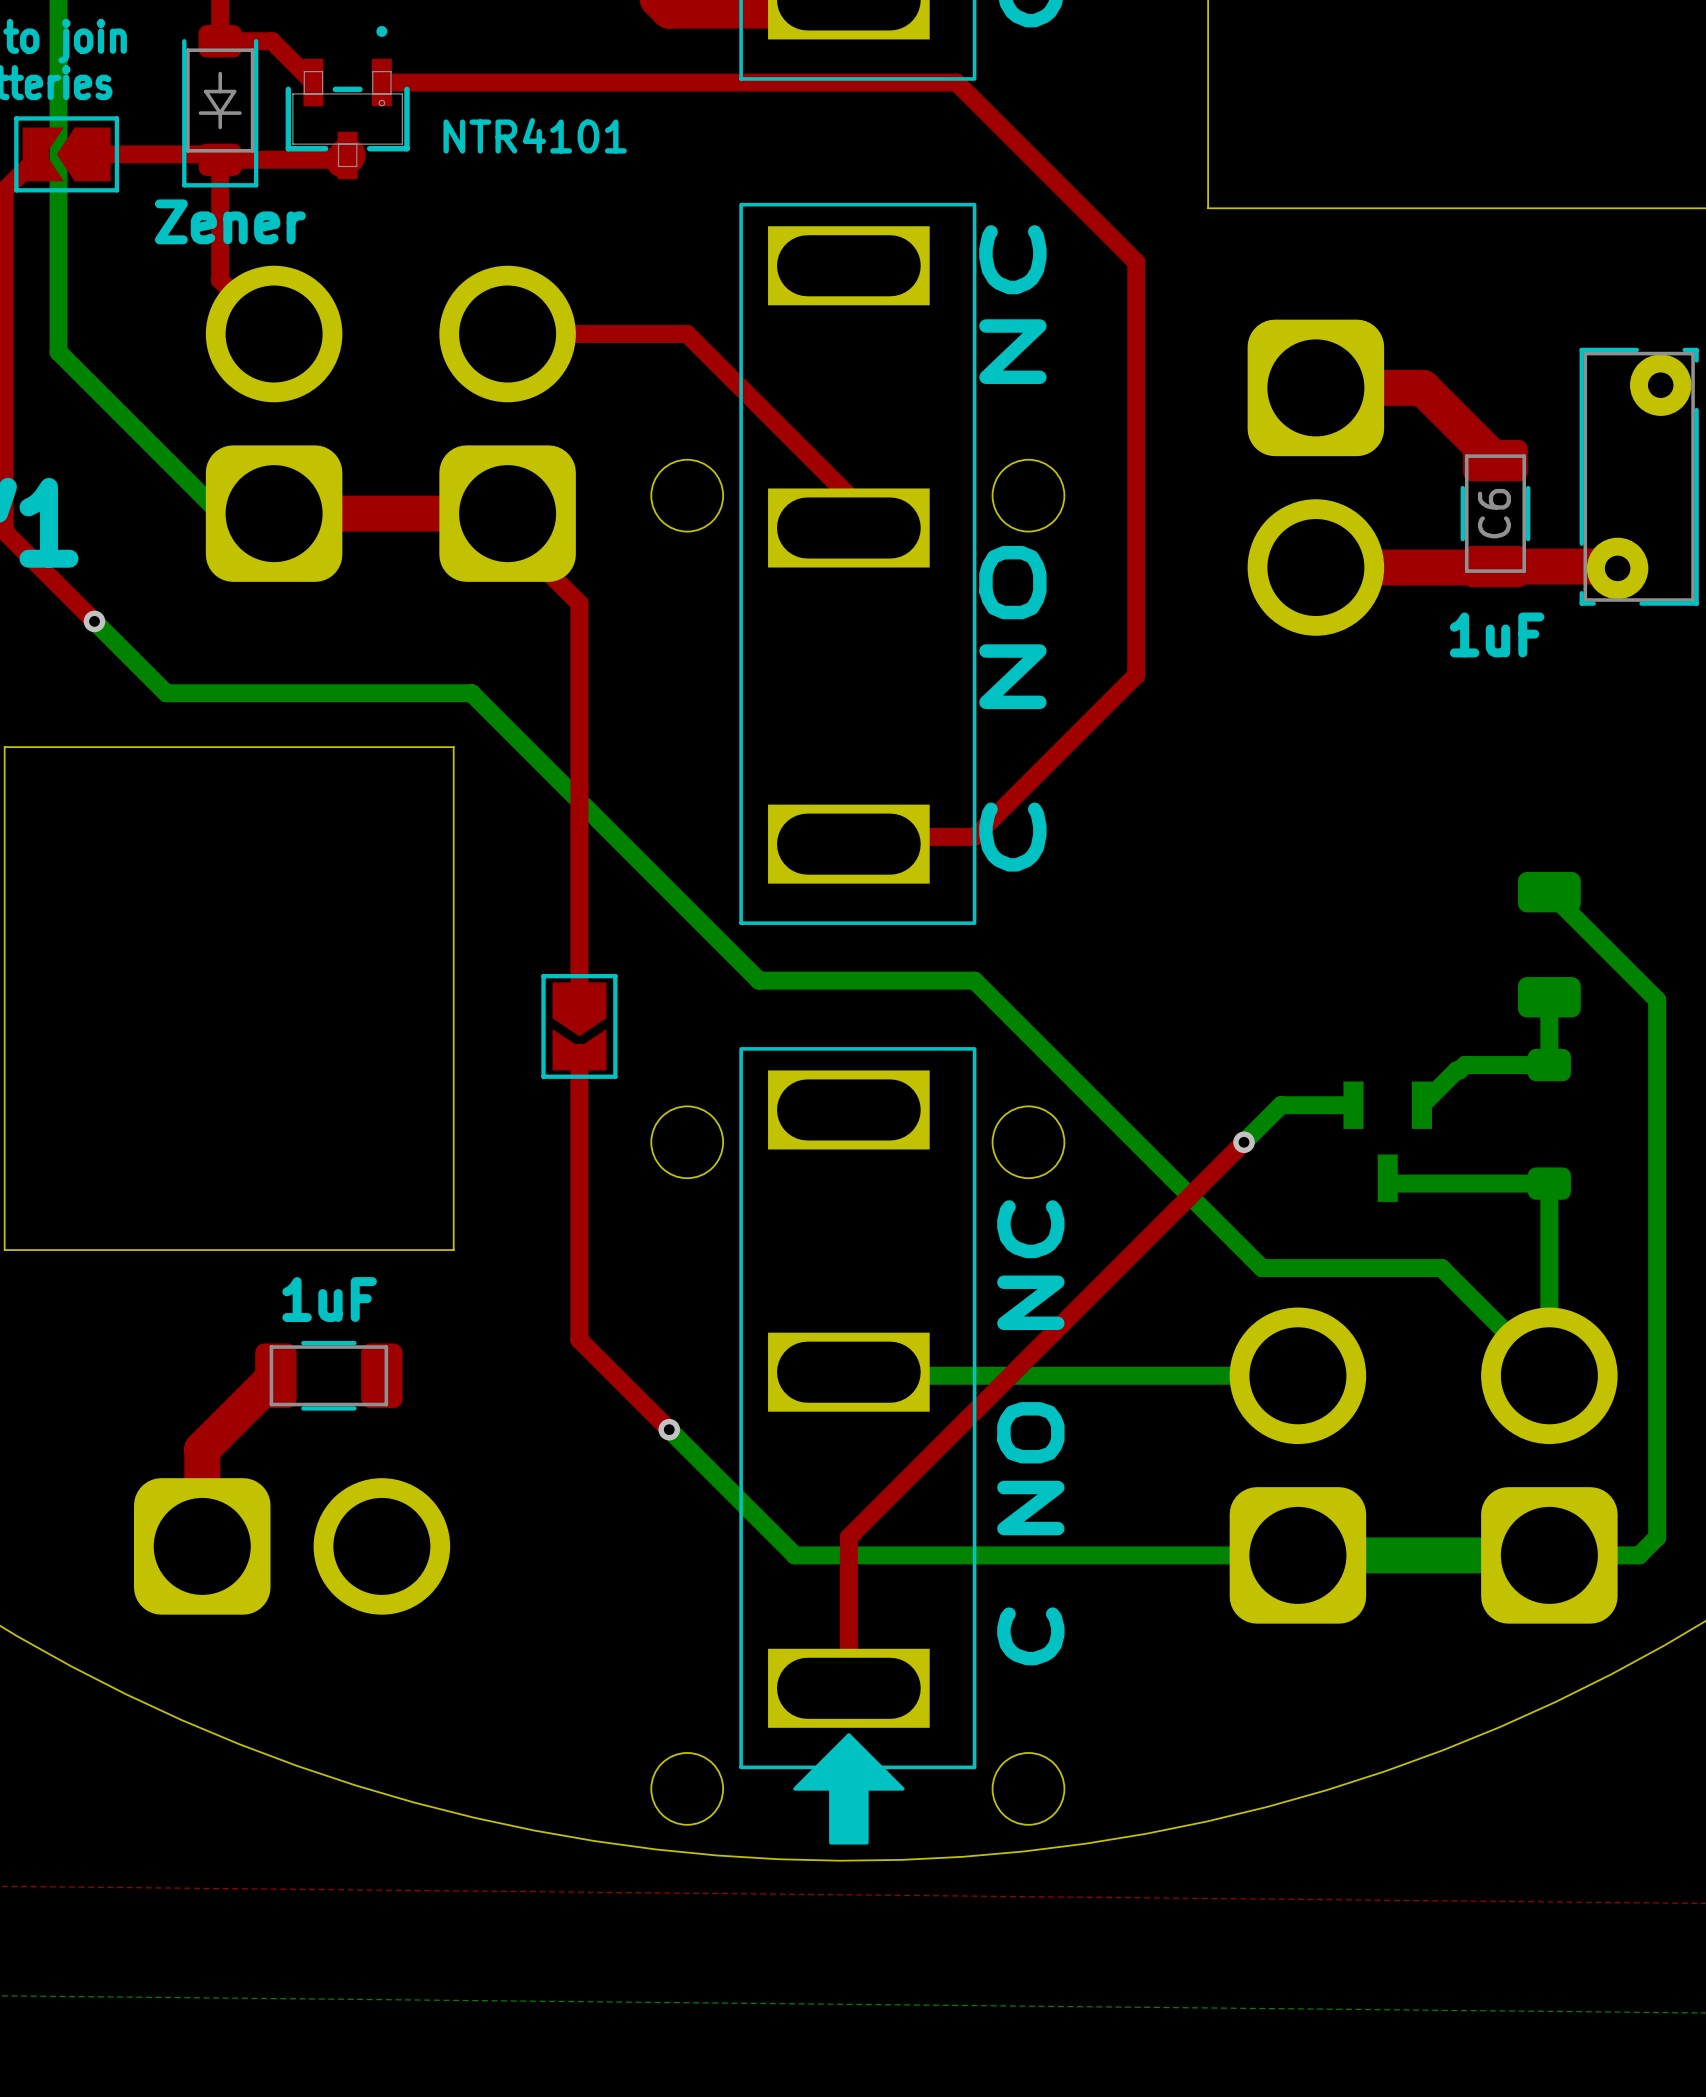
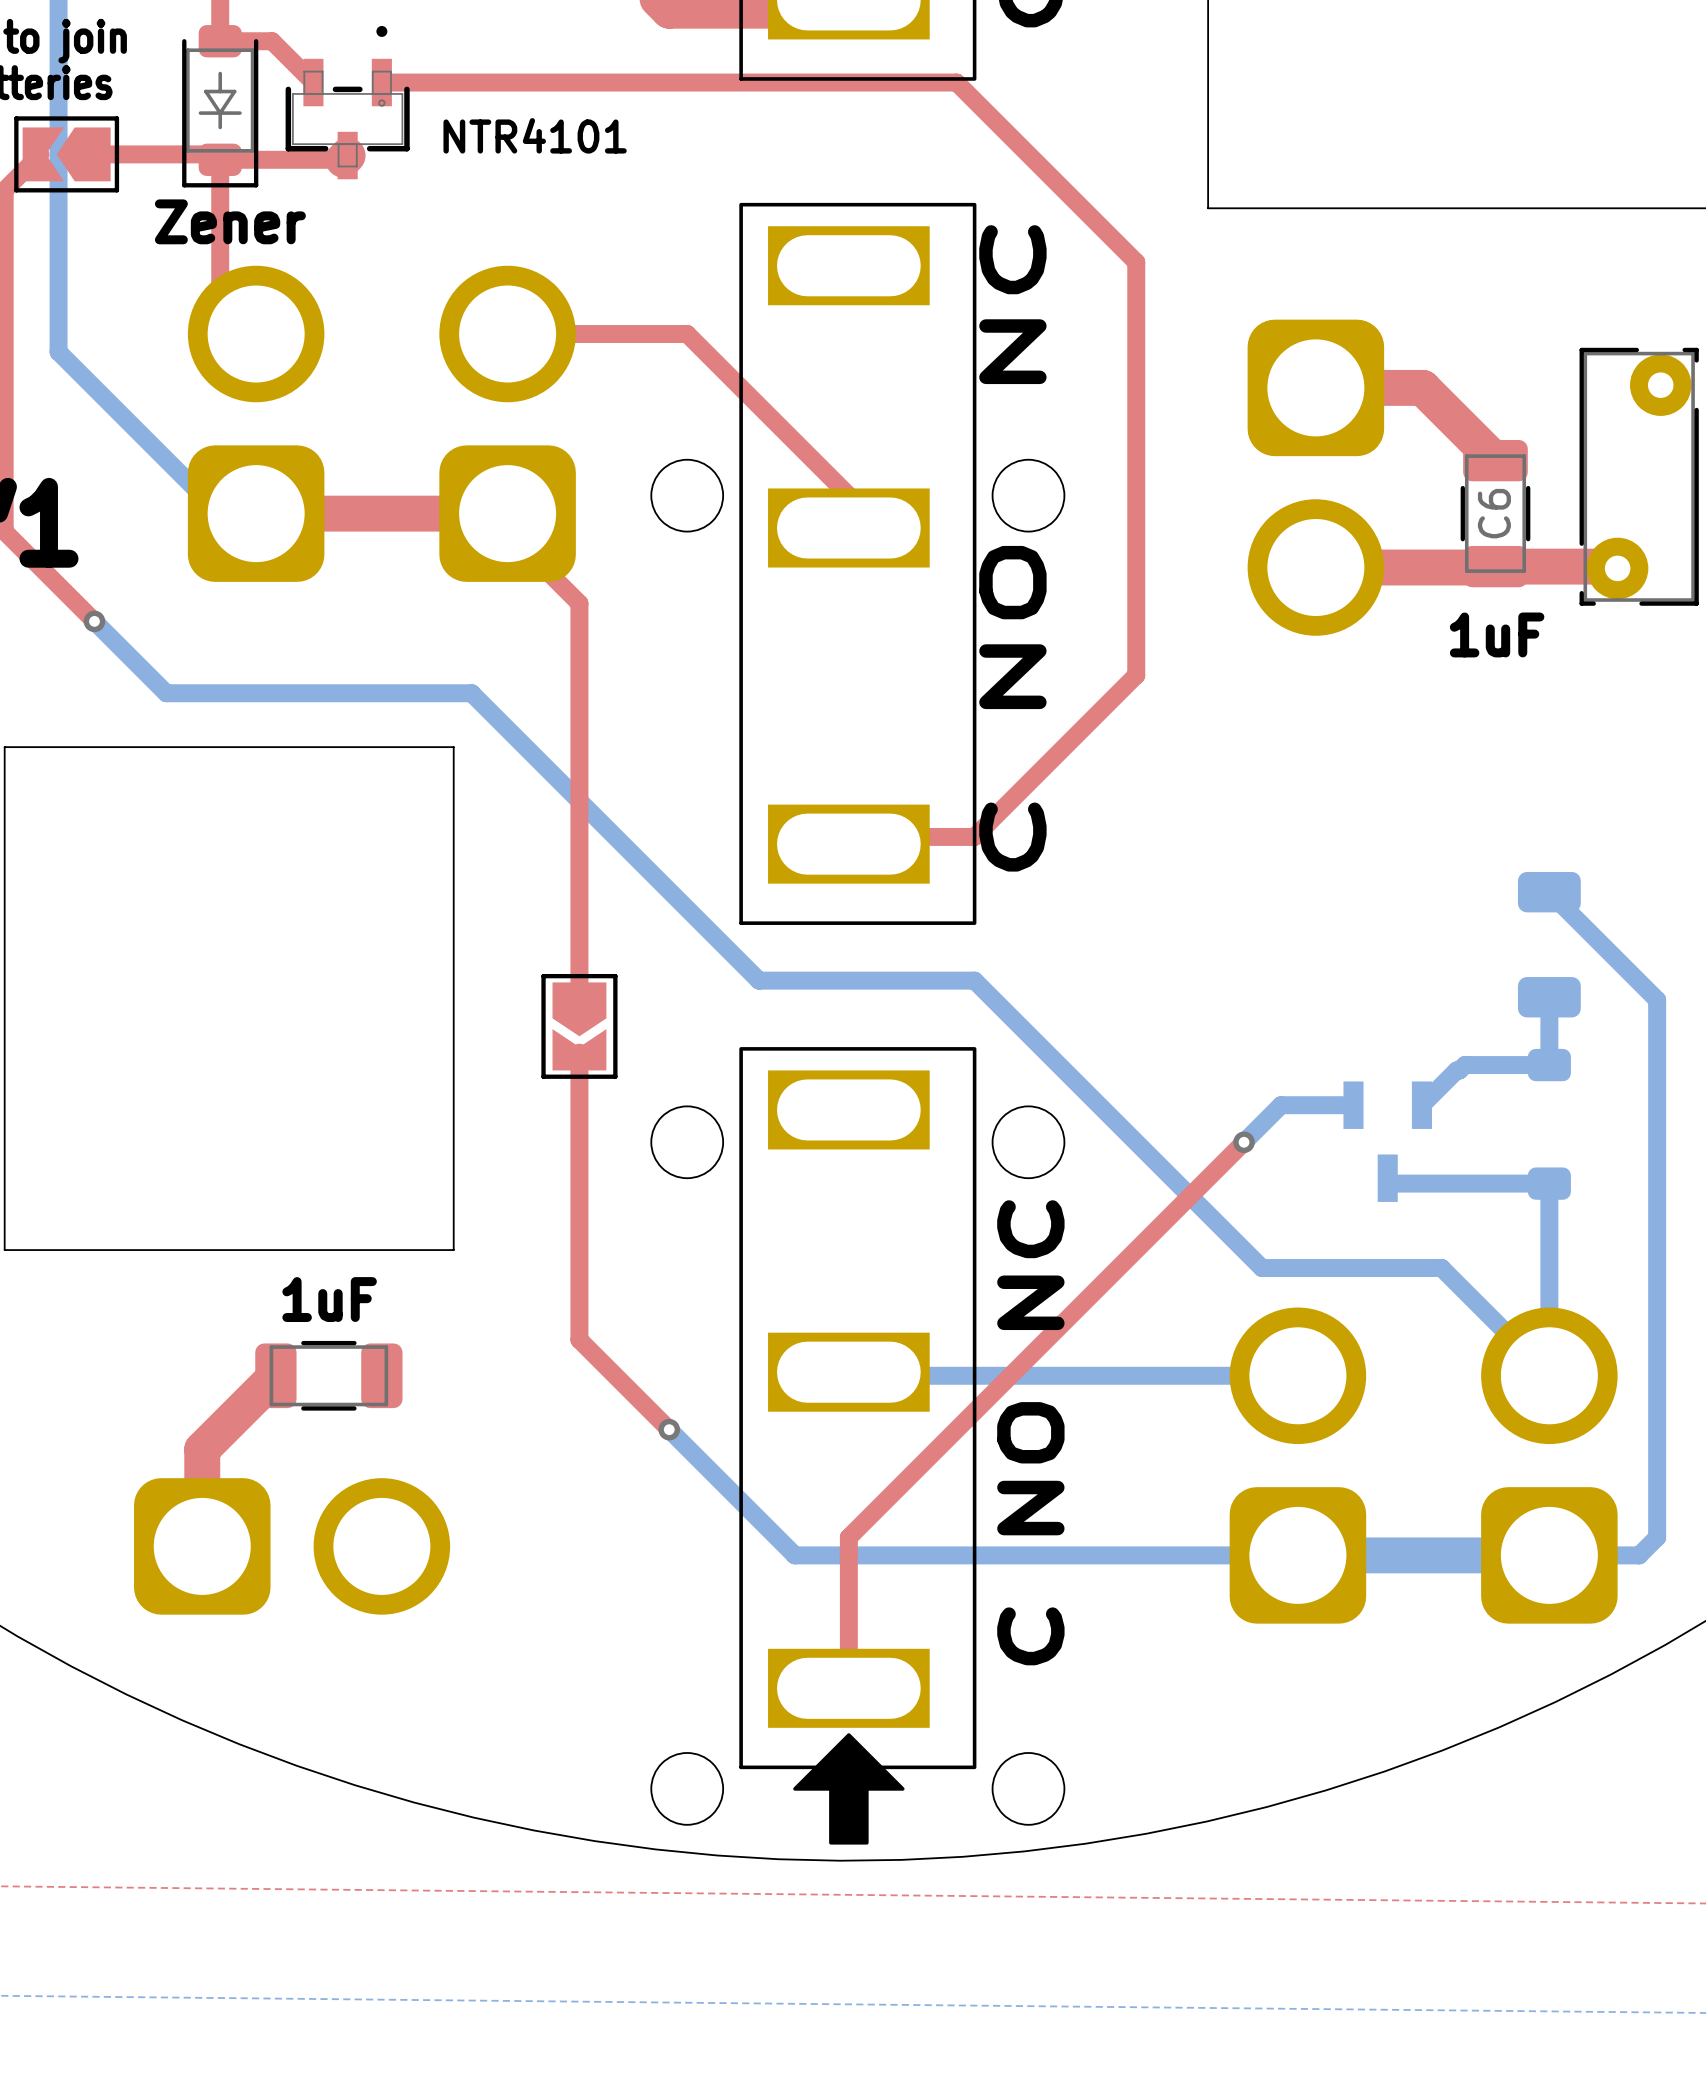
part position: (274, 423) -> (256, 423)

